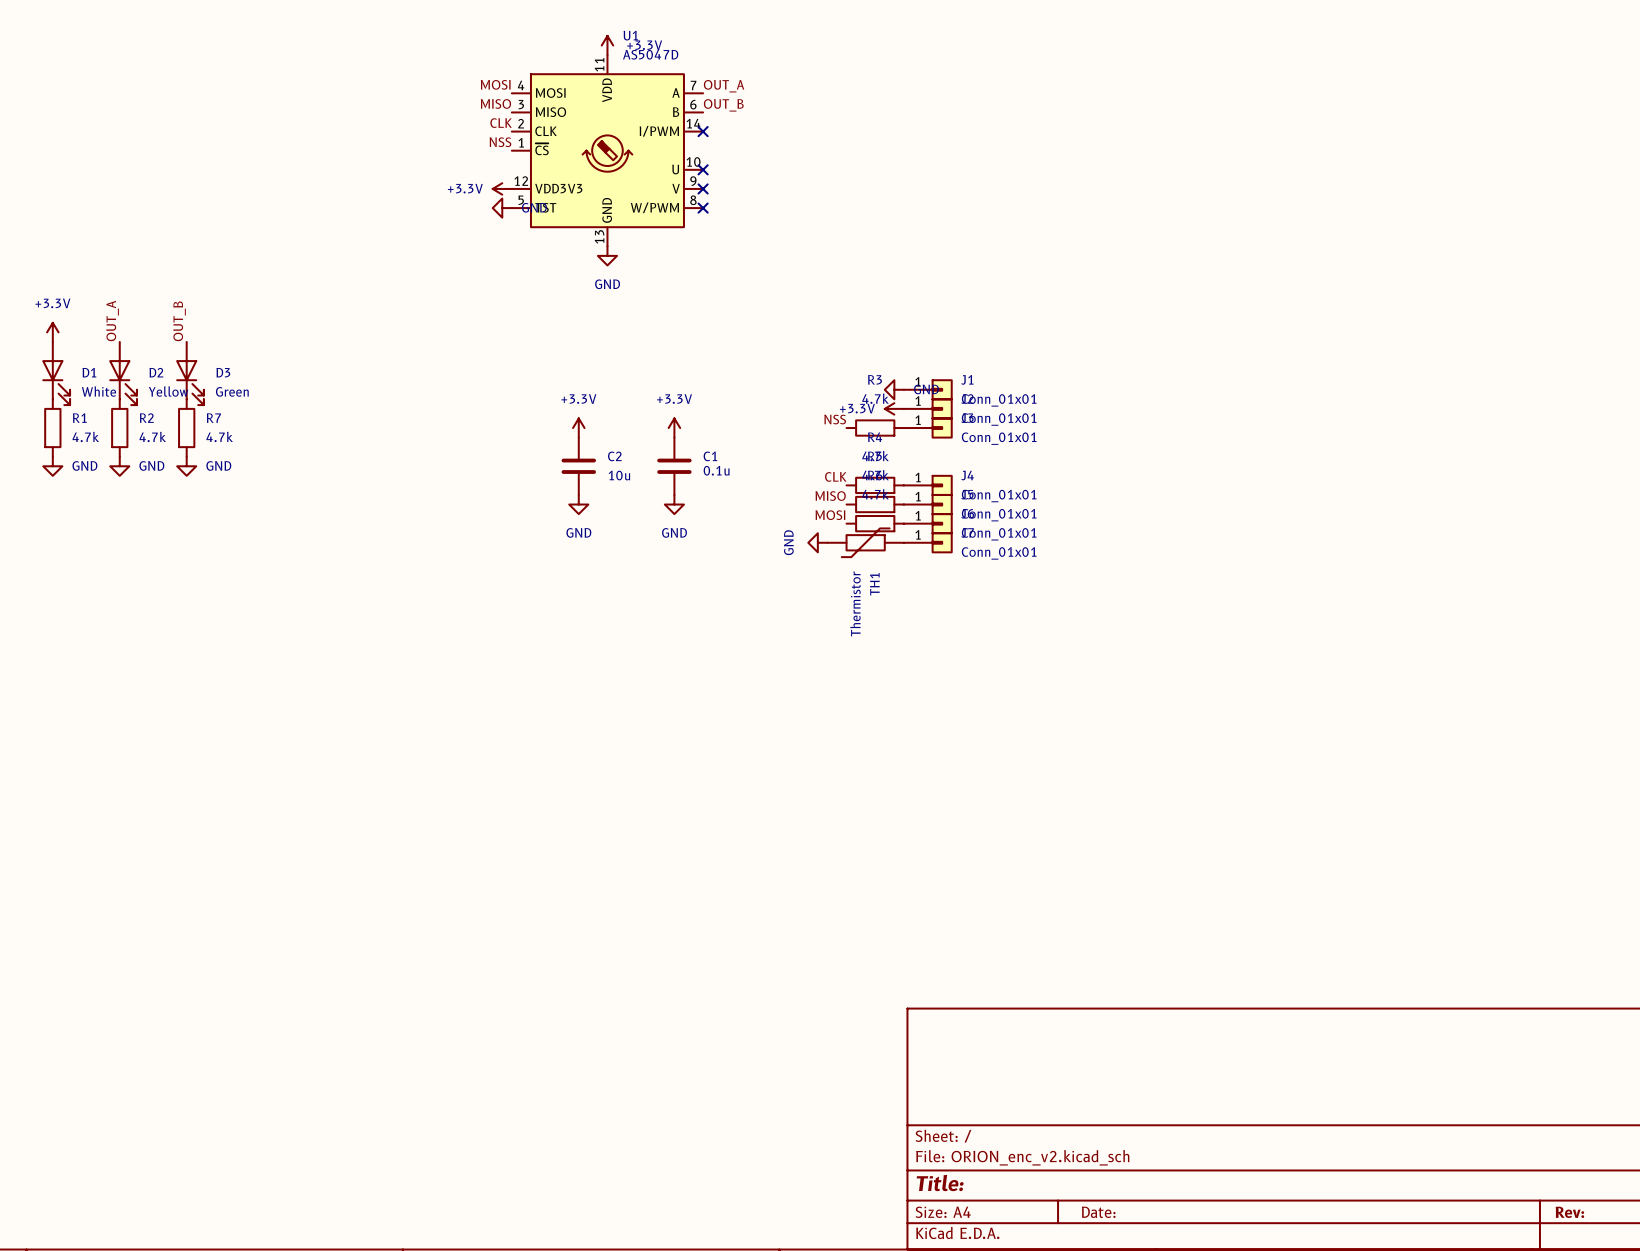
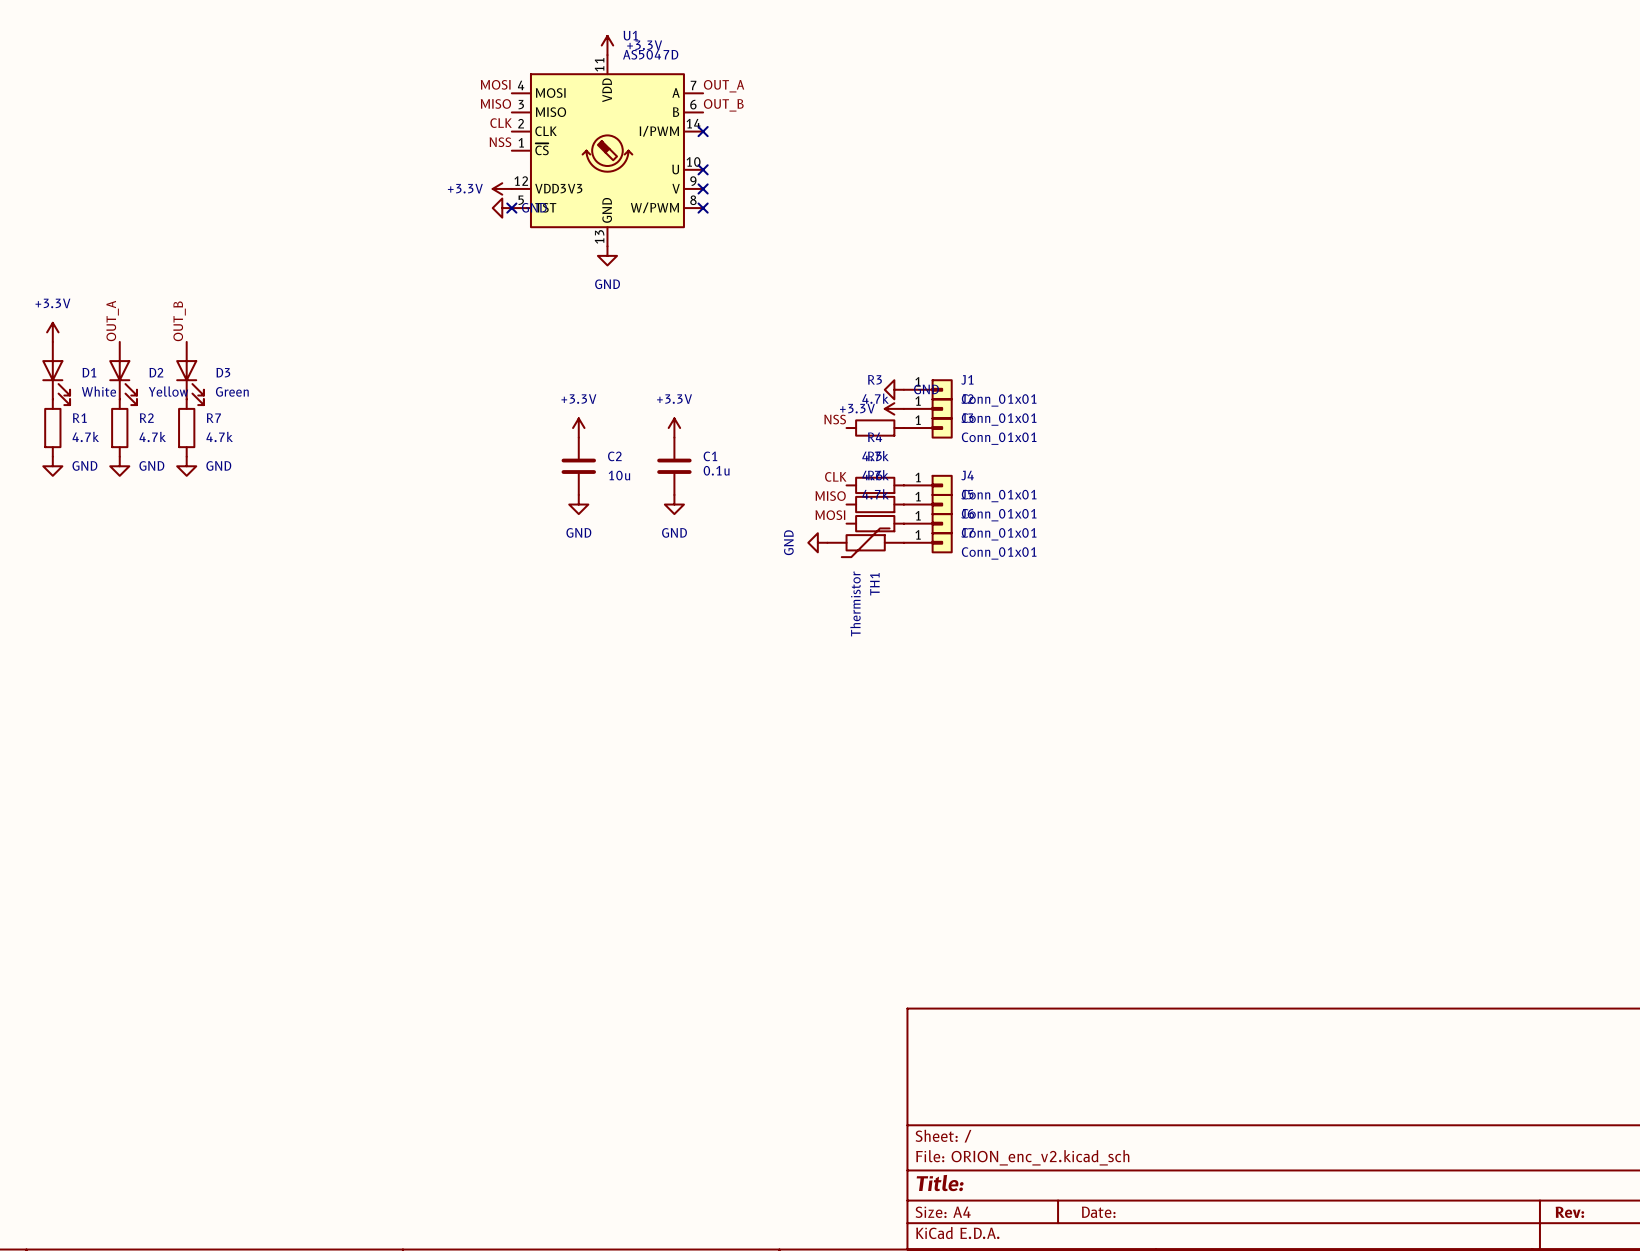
no-connect mark: none -> (511, 208)

